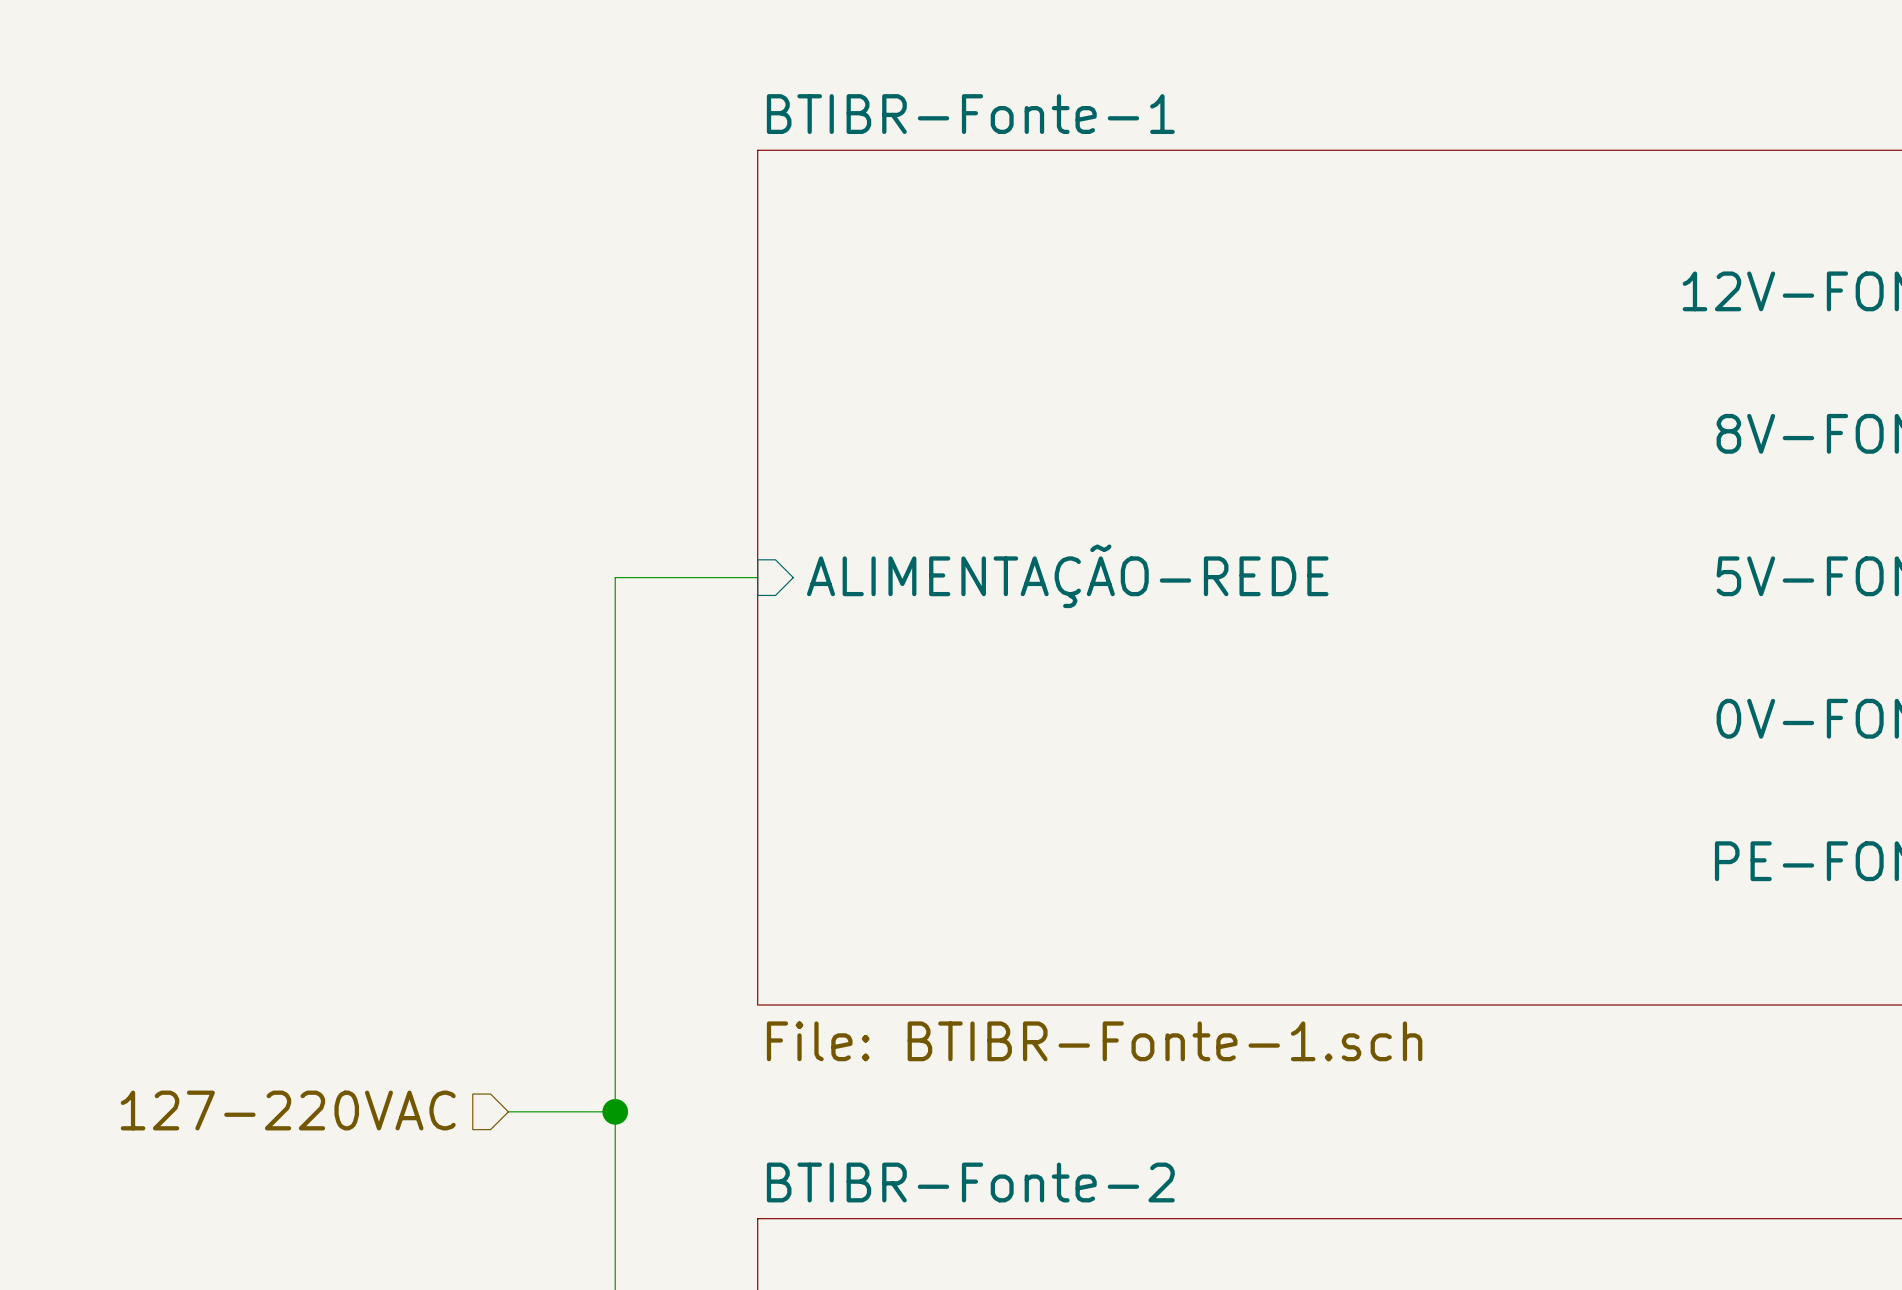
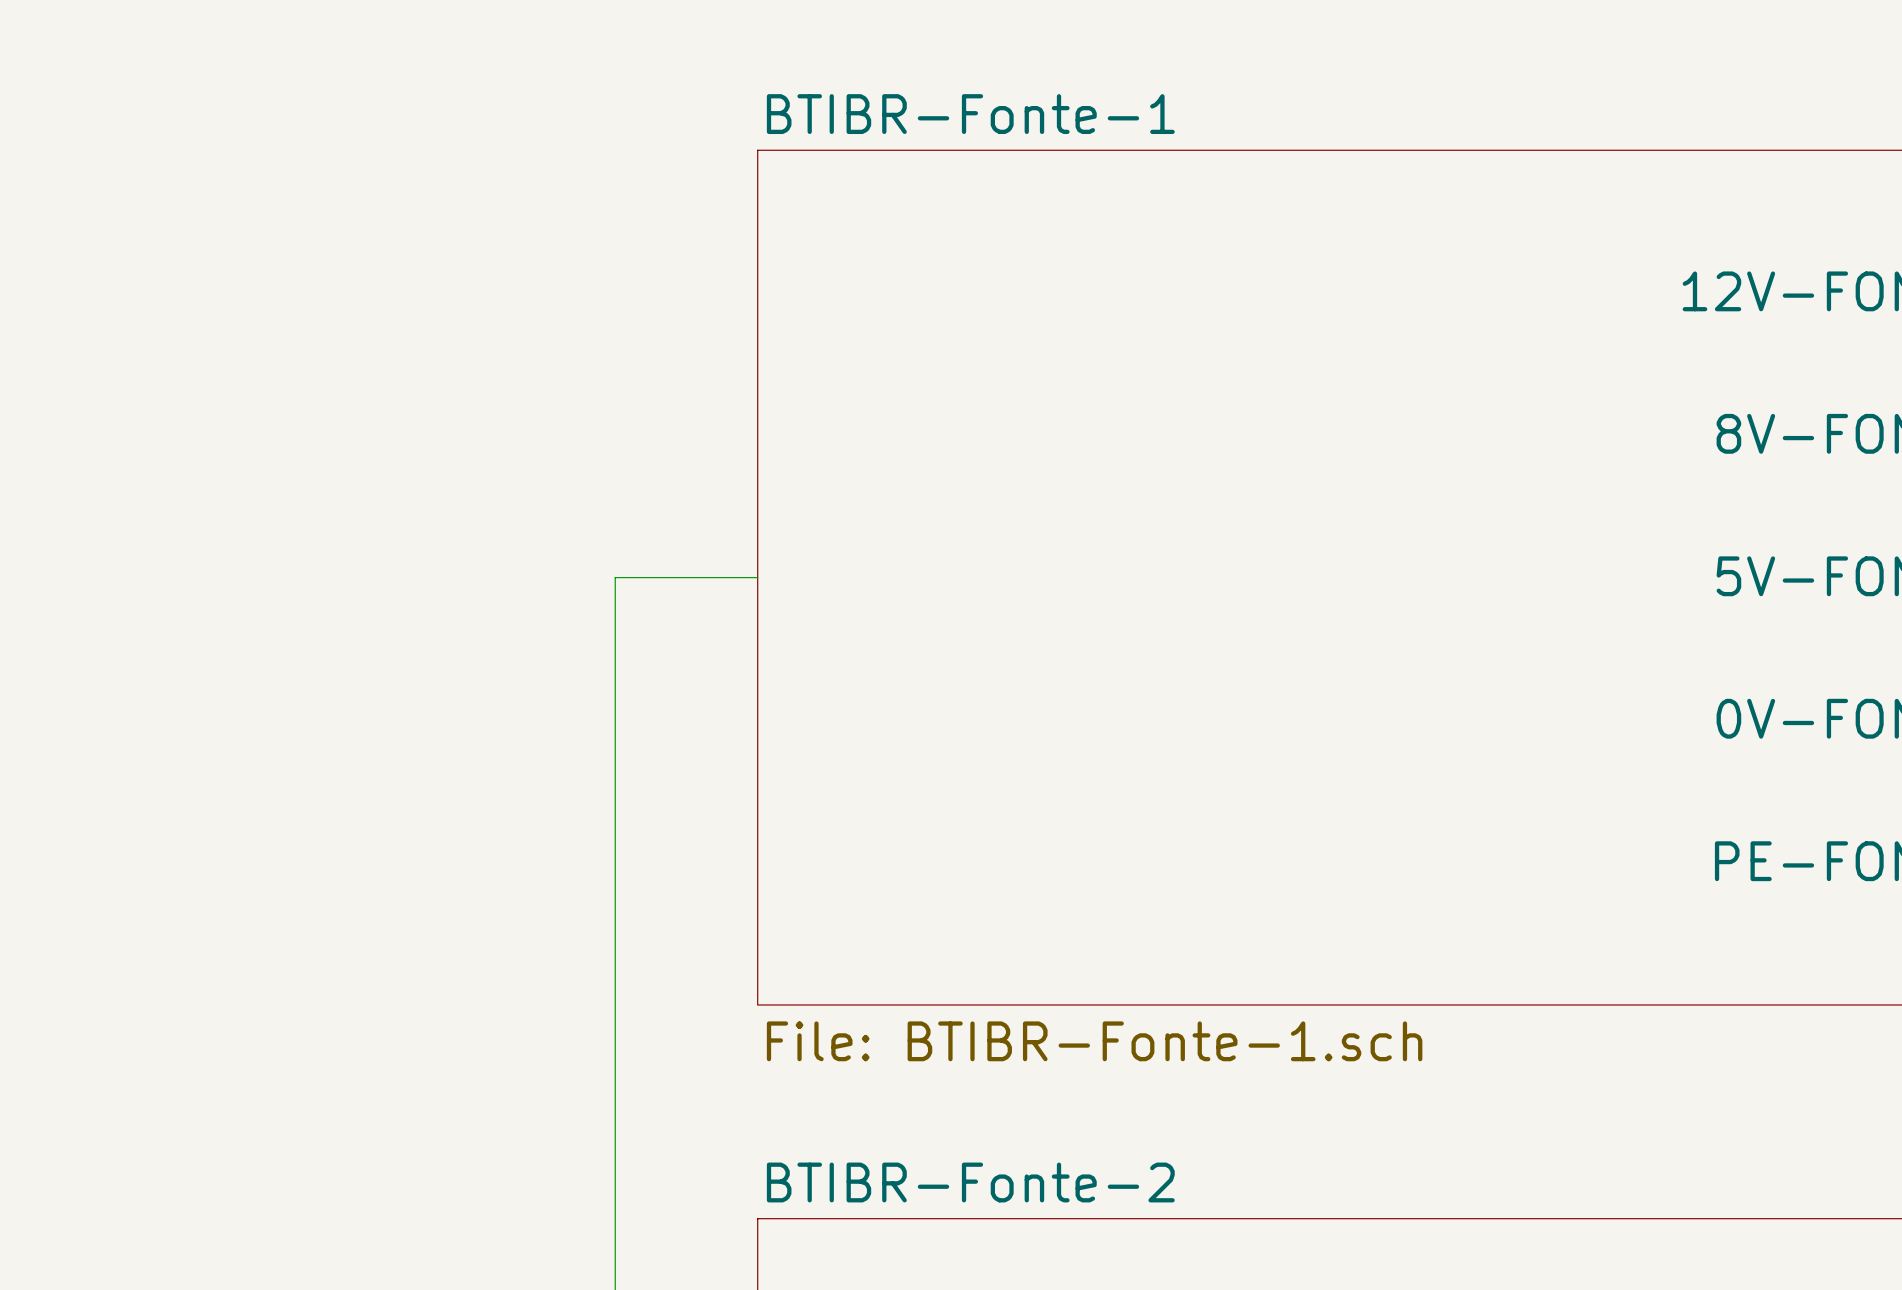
sheet pin: ALIMENTAÇÃO-REDE (1067, 576) -> none
hierarchical label: 127-220VAC (288, 1110) -> none
wire: (508, 1111) (615, 1111) -> none
junction: (615, 1111) -> none

